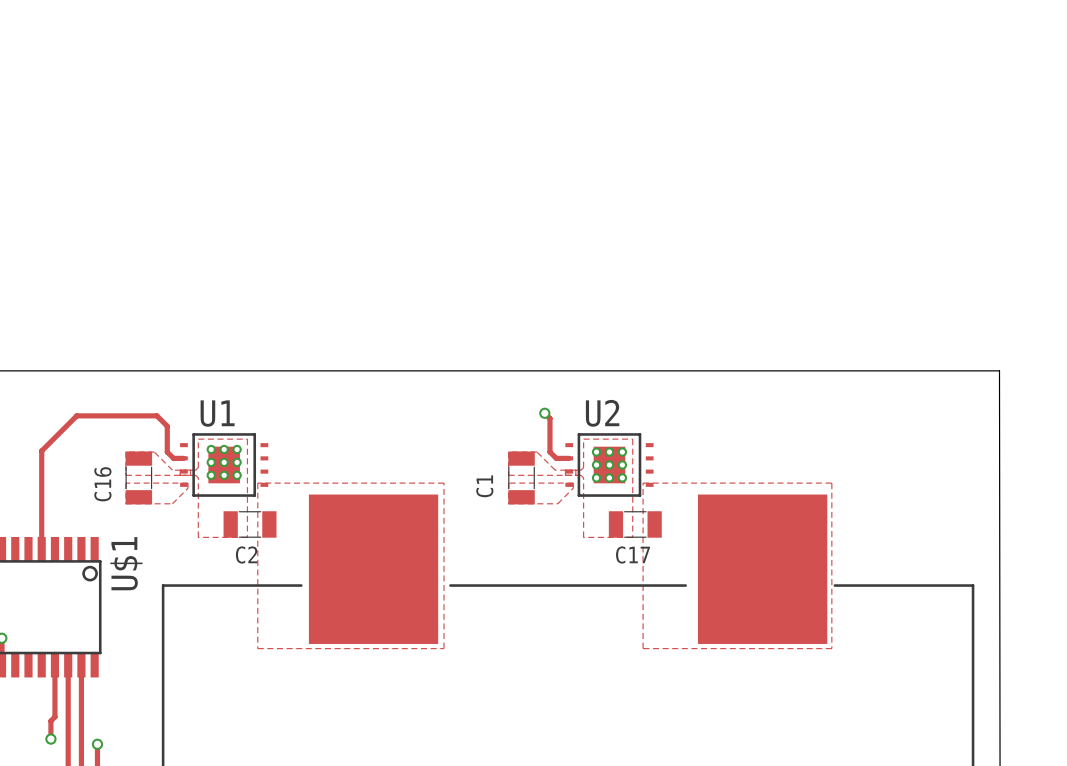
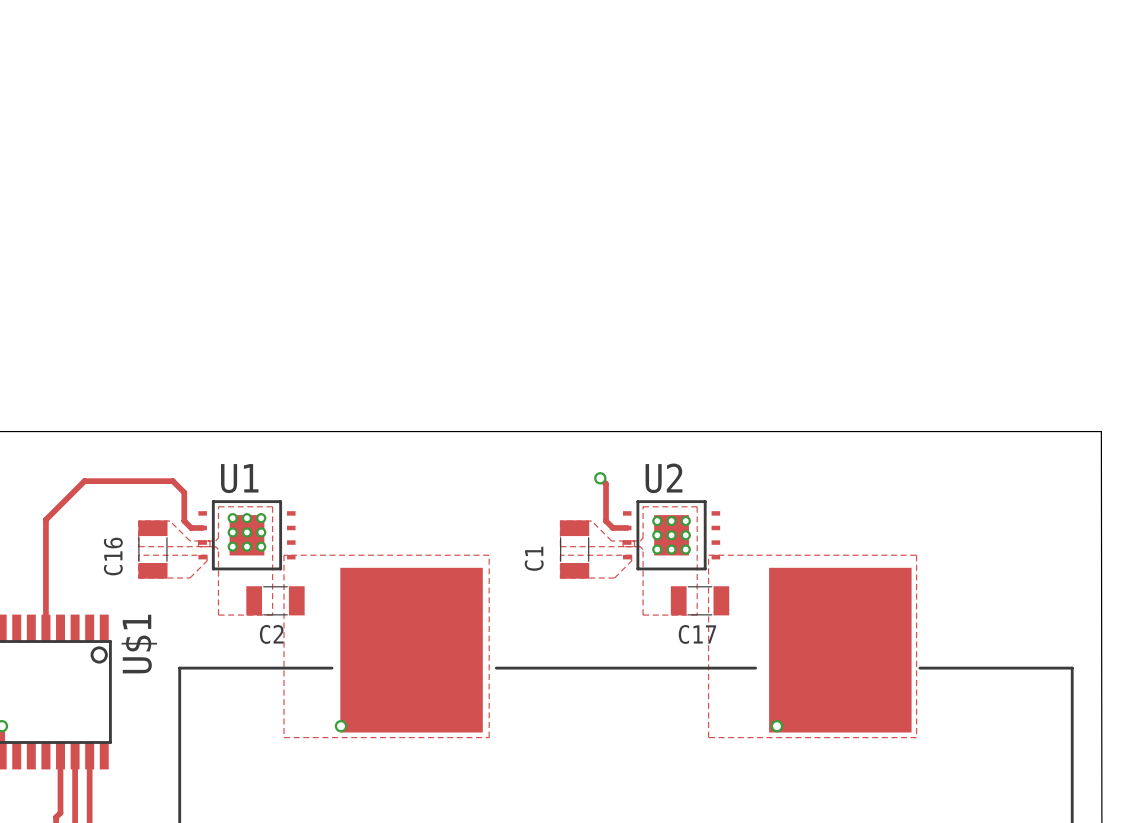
via: none -> (341, 726)
via: none -> (776, 726)

